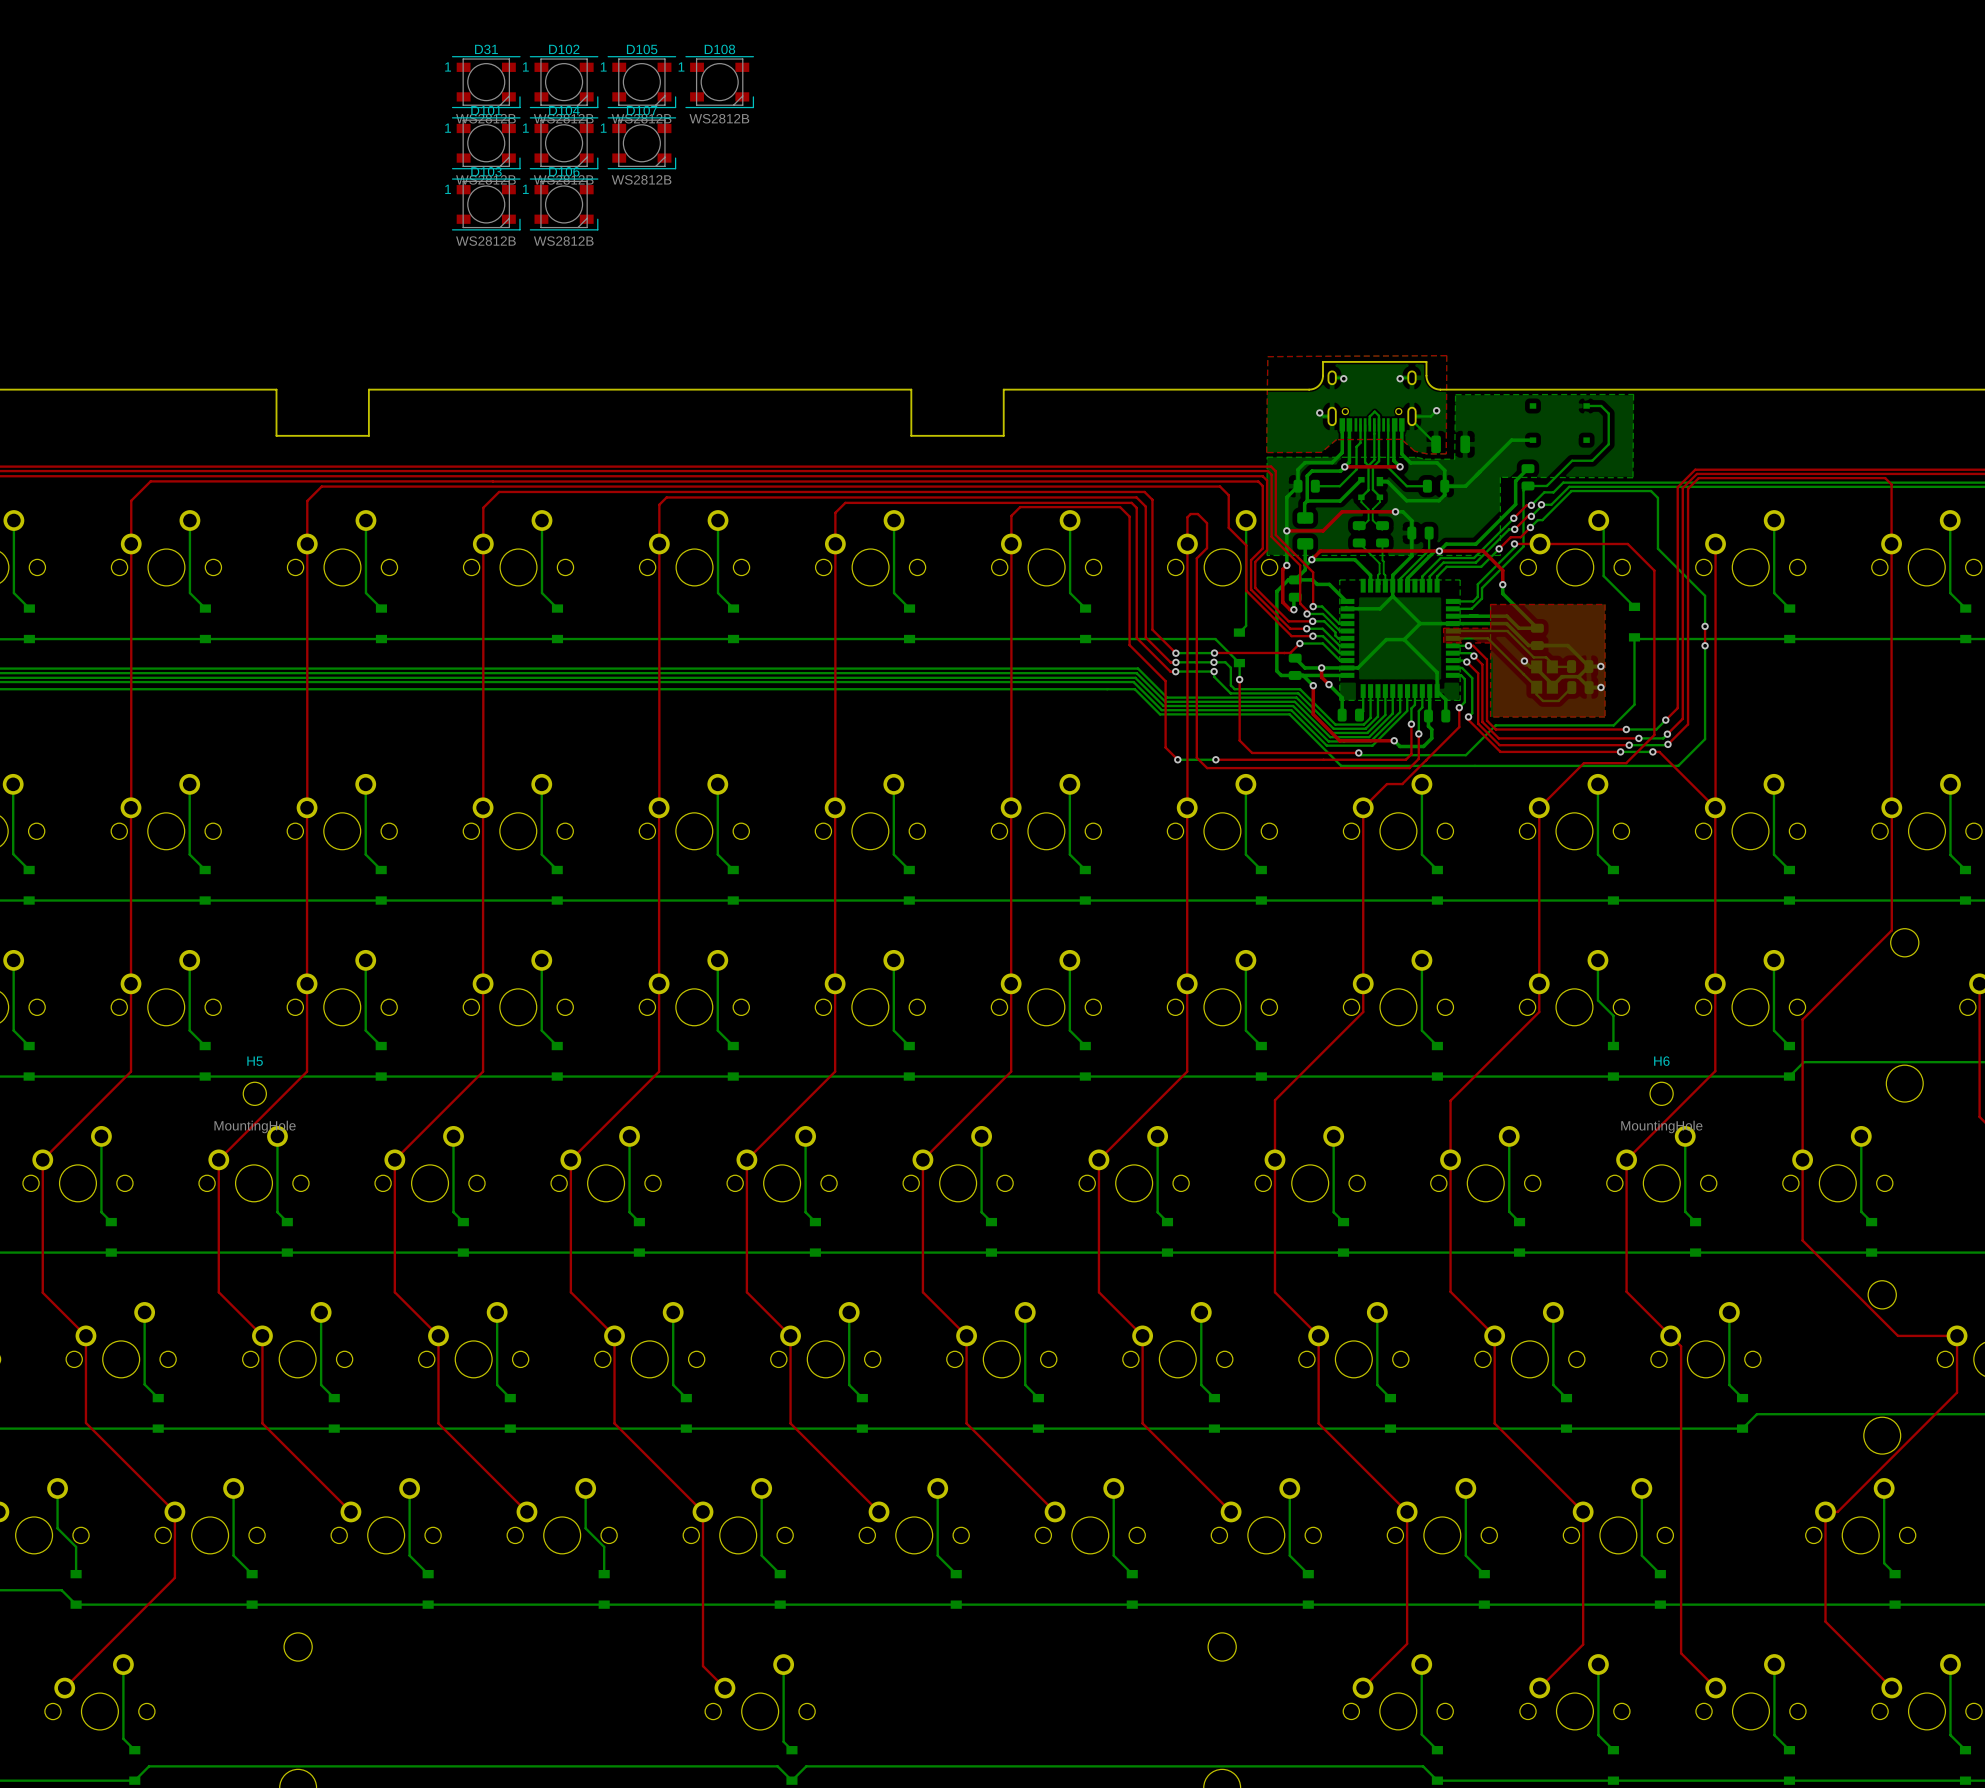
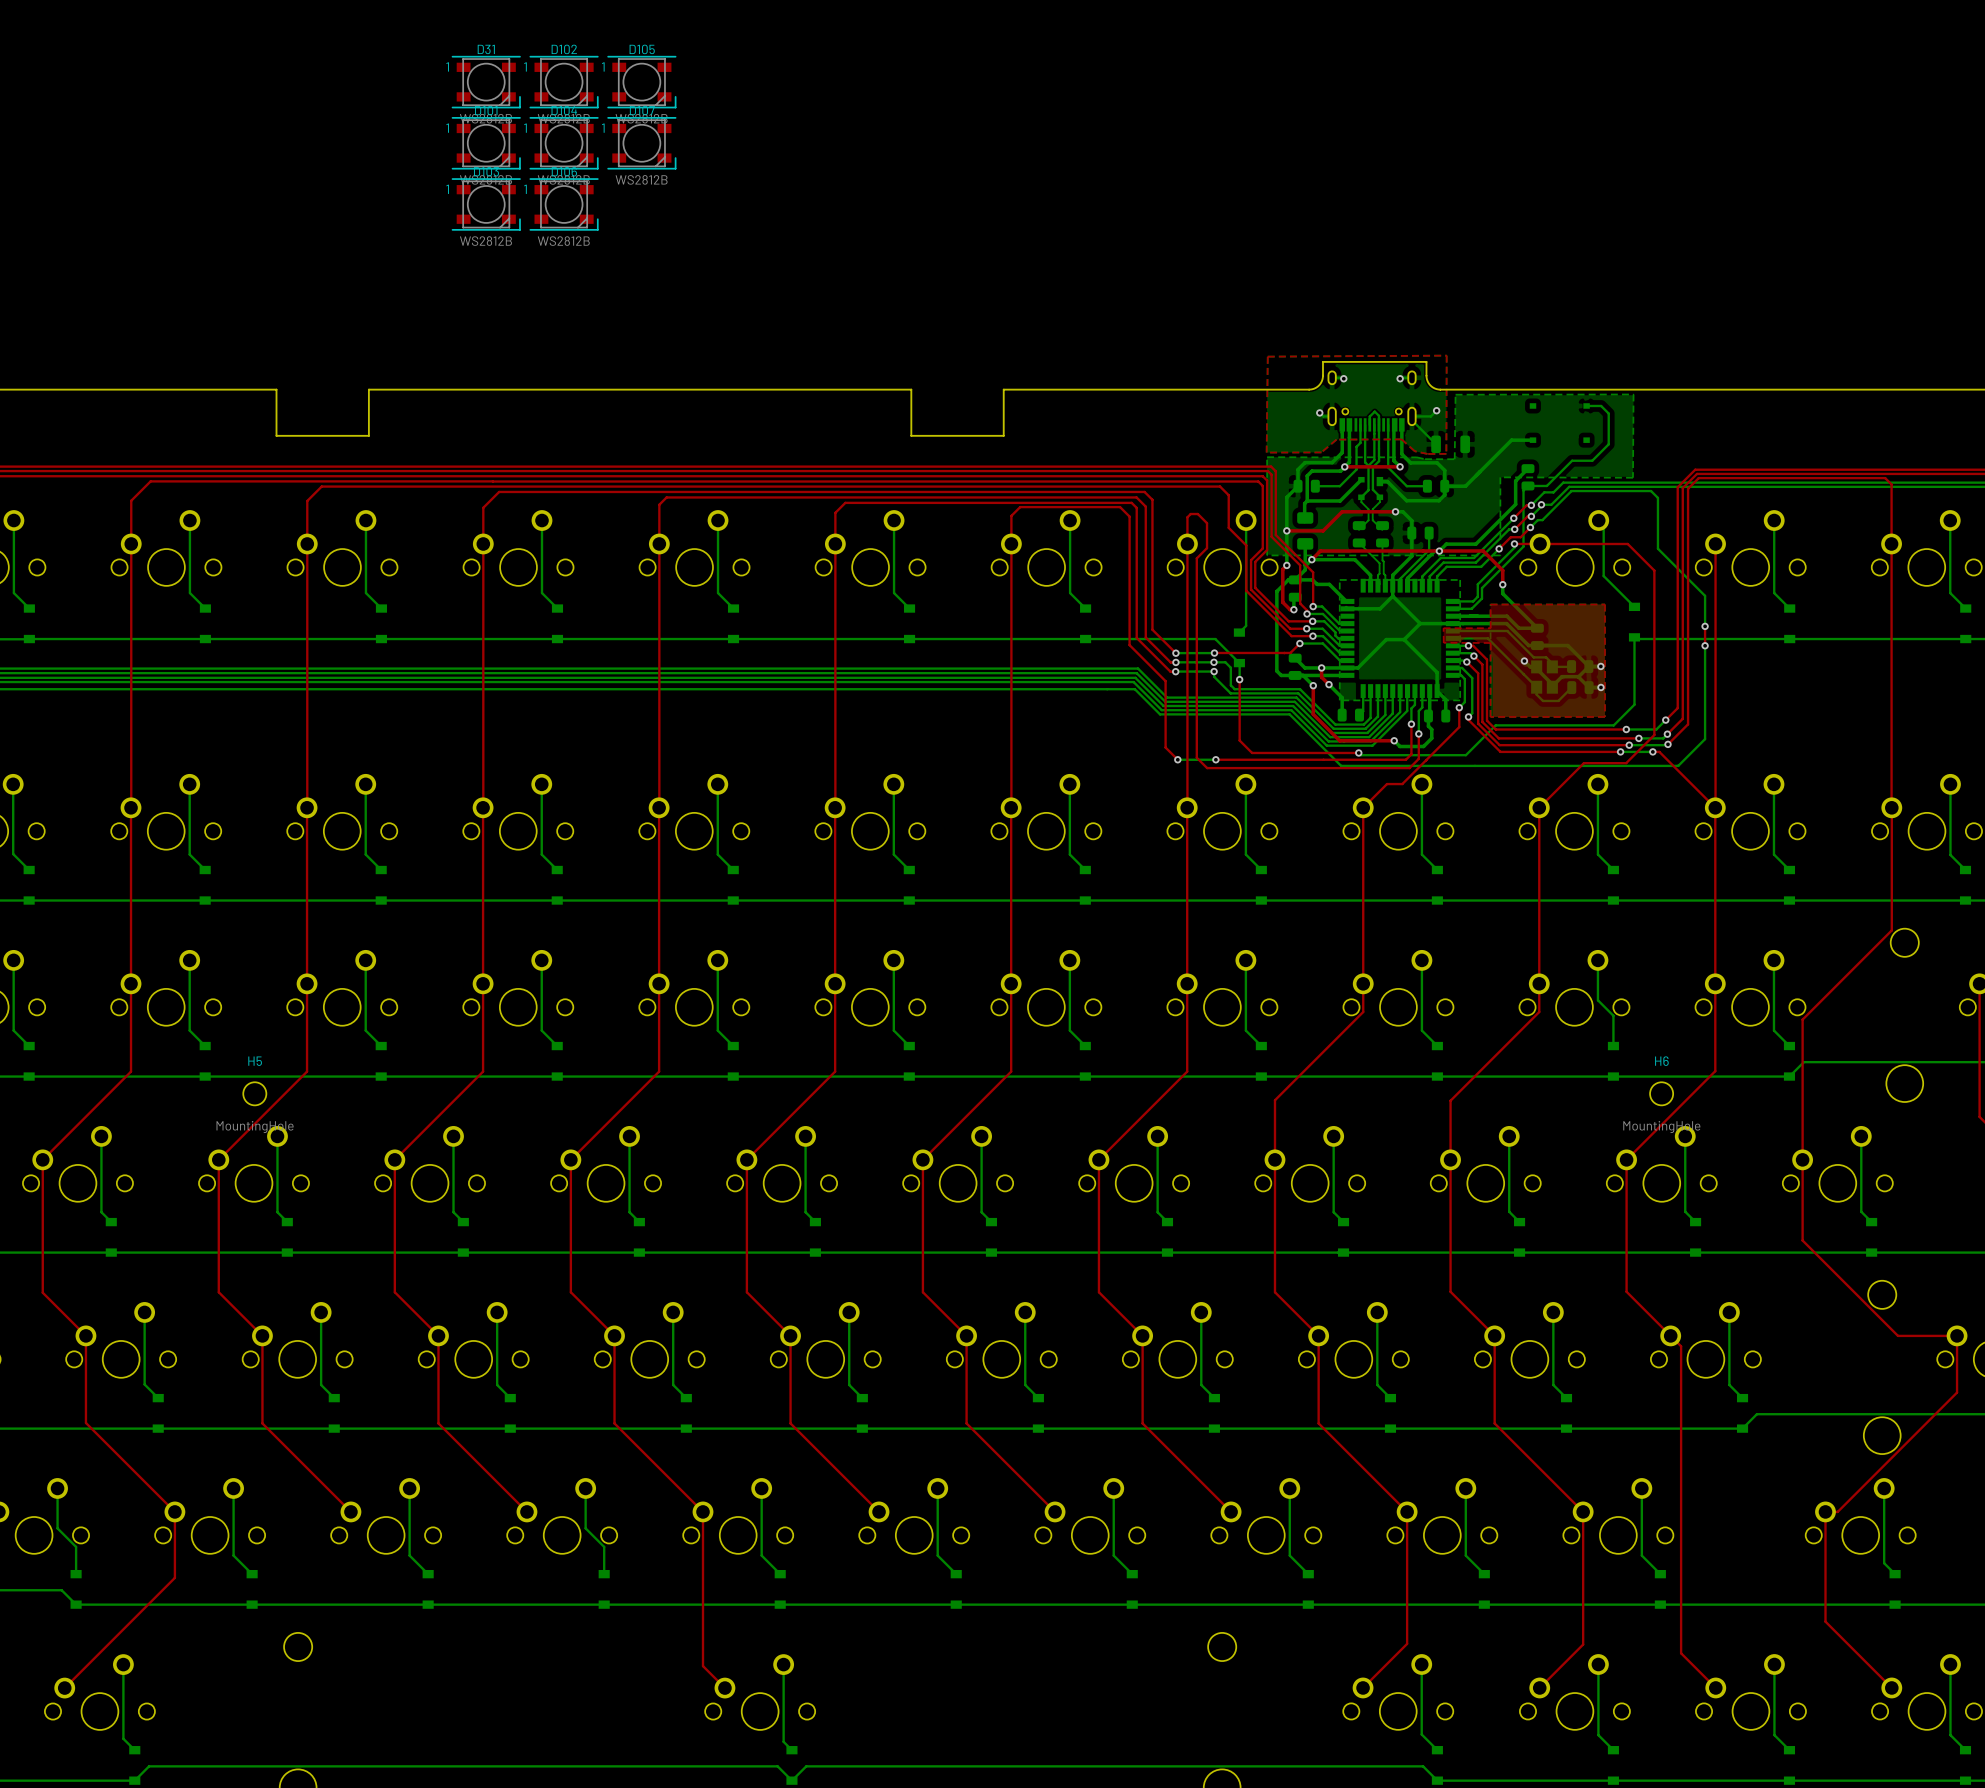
D108: WS2812B (719, 82) -> none

